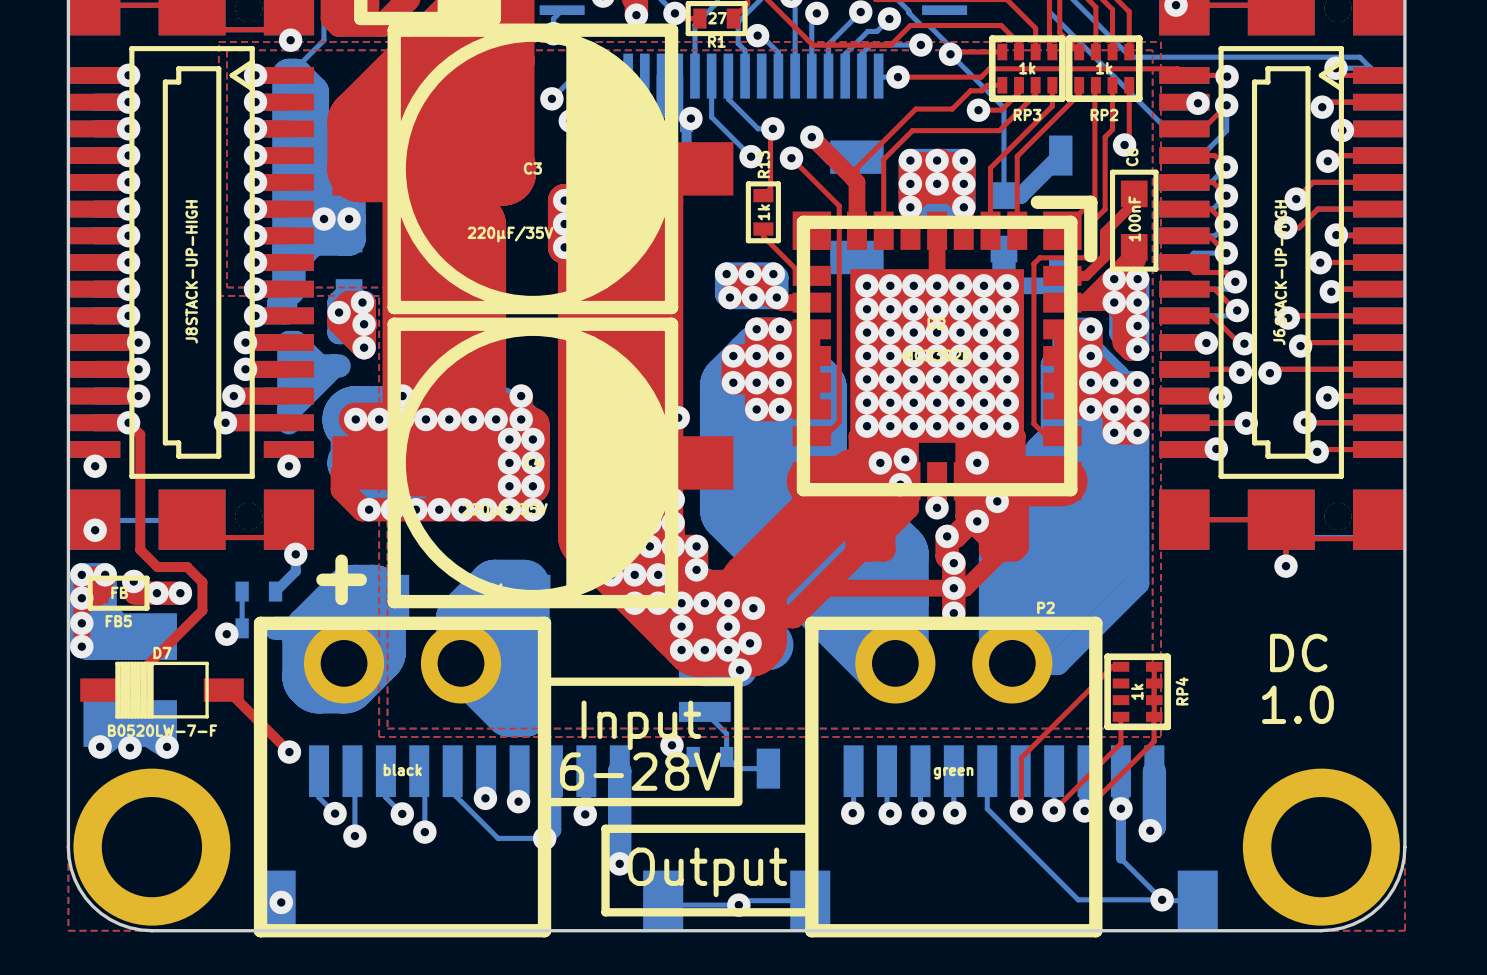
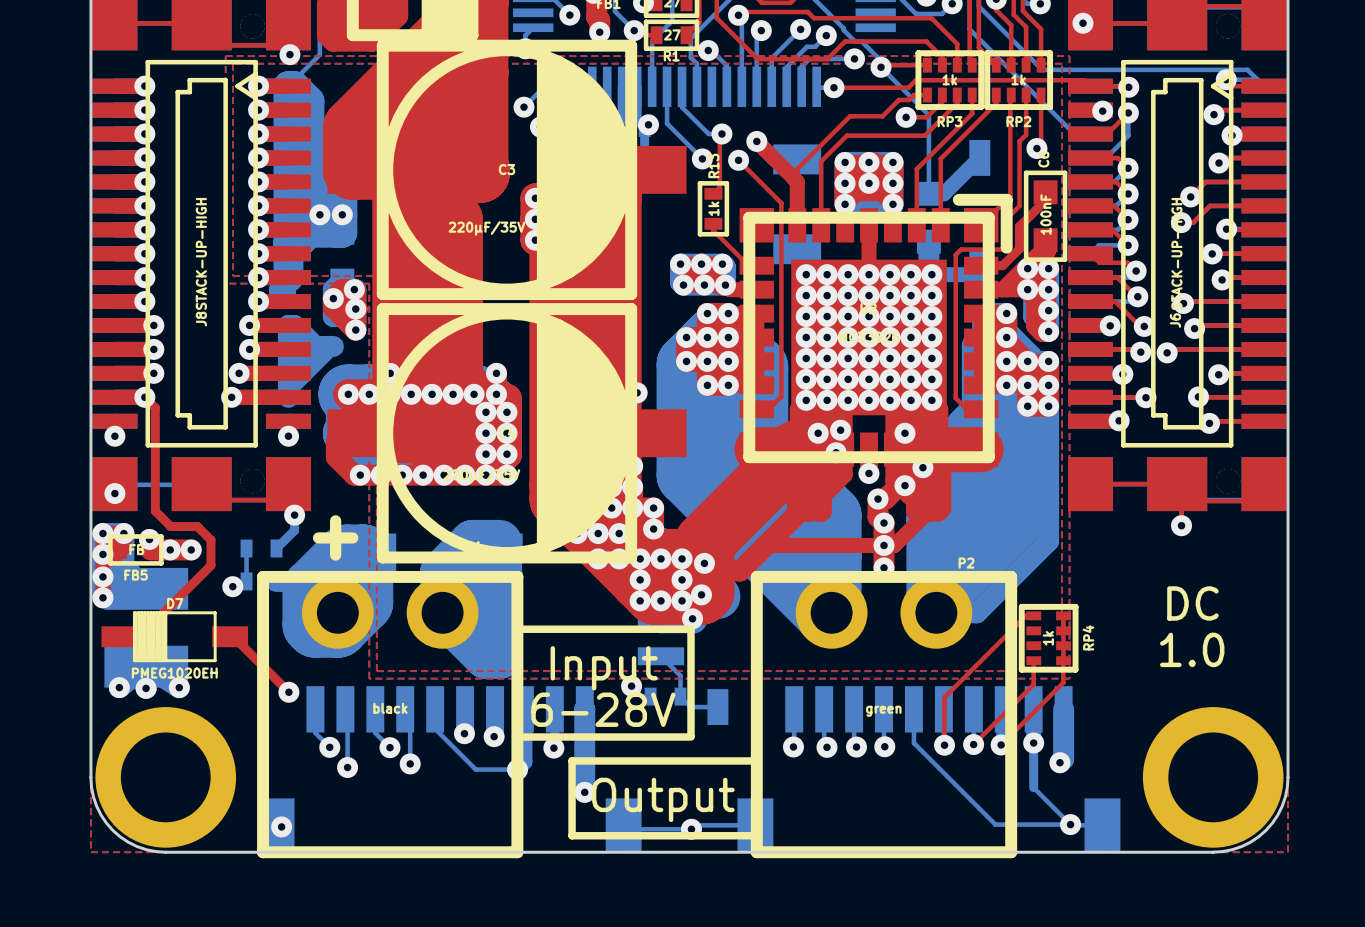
D7 value: B0520LW-7-F (162, 730) -> PMEG1020EH (174, 673)

